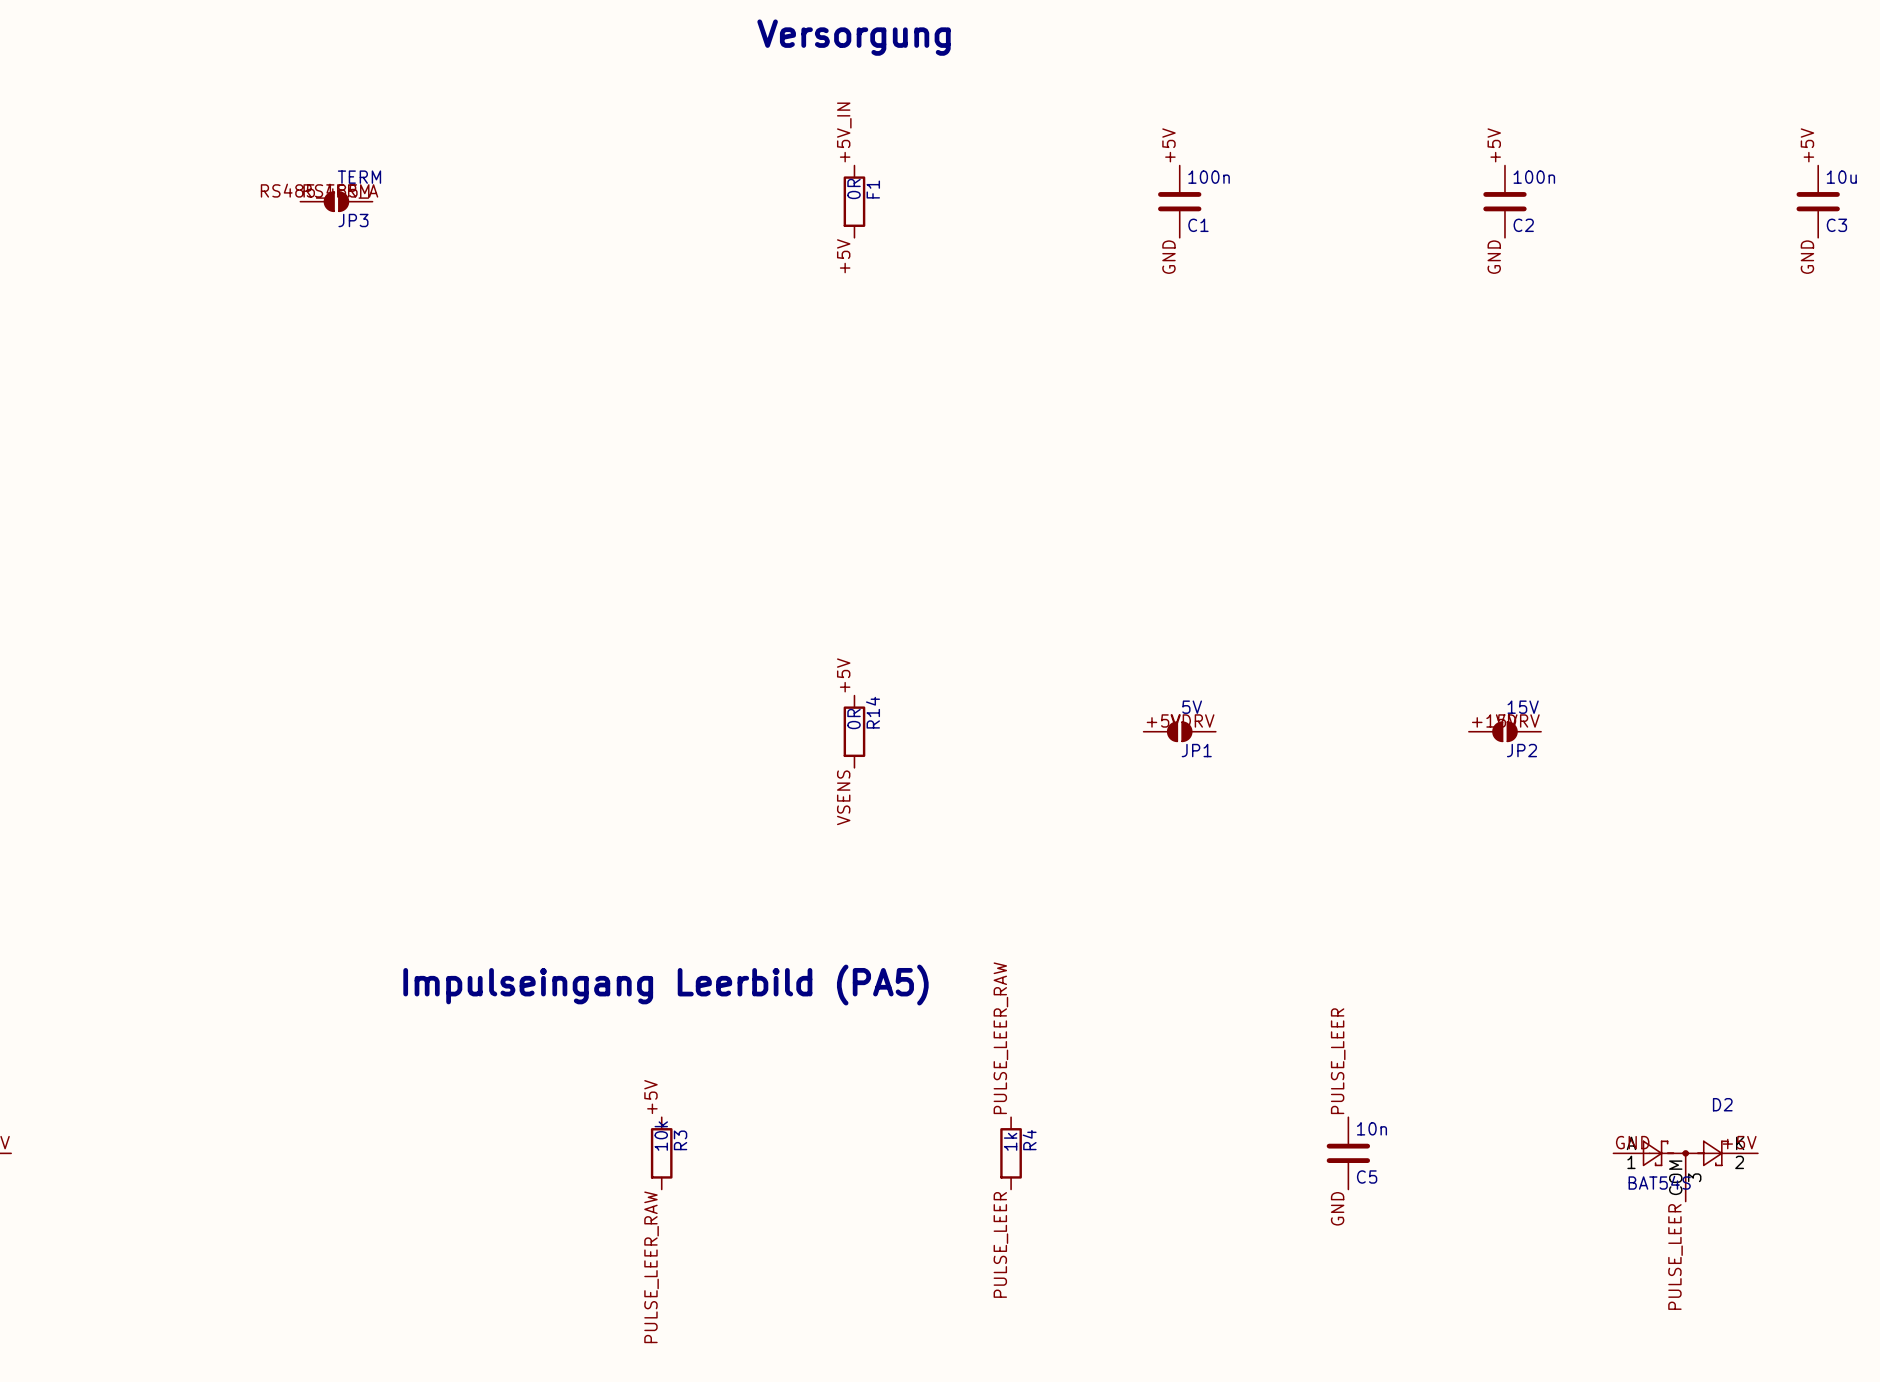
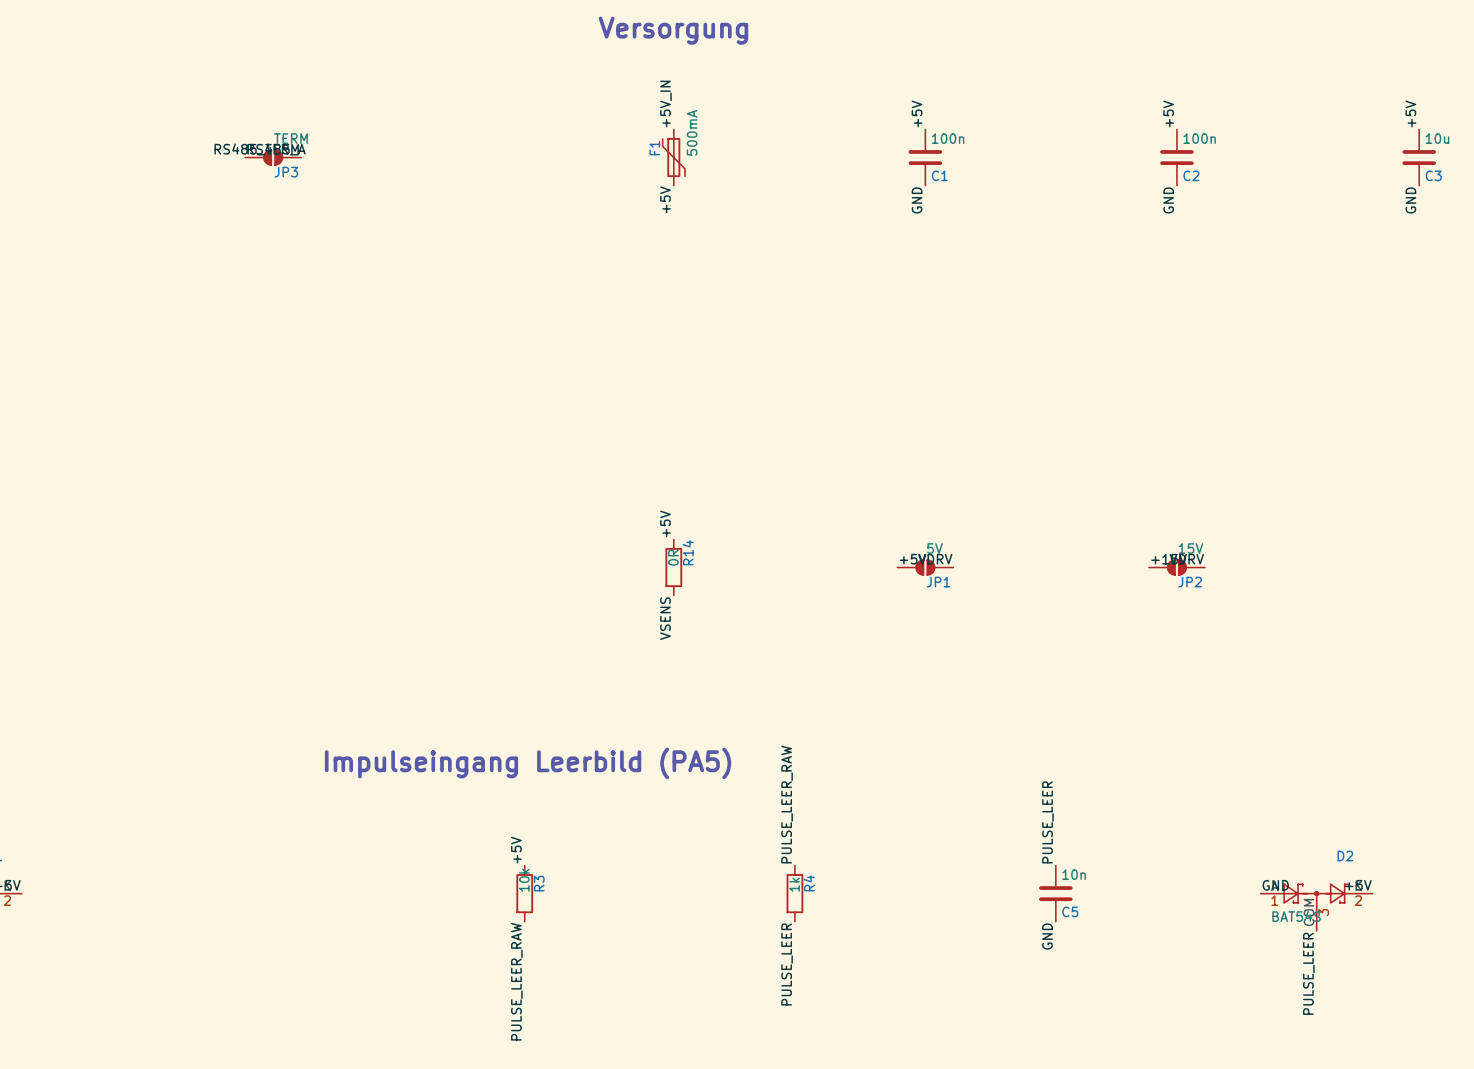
F1 symbol: [843, 165, 866, 238] -> [662, 129, 685, 186]
F1 value: 0R (854, 188) -> 500mA (692, 132)
F1 name position: F1 (873, 189) -> F1 (654, 148)

